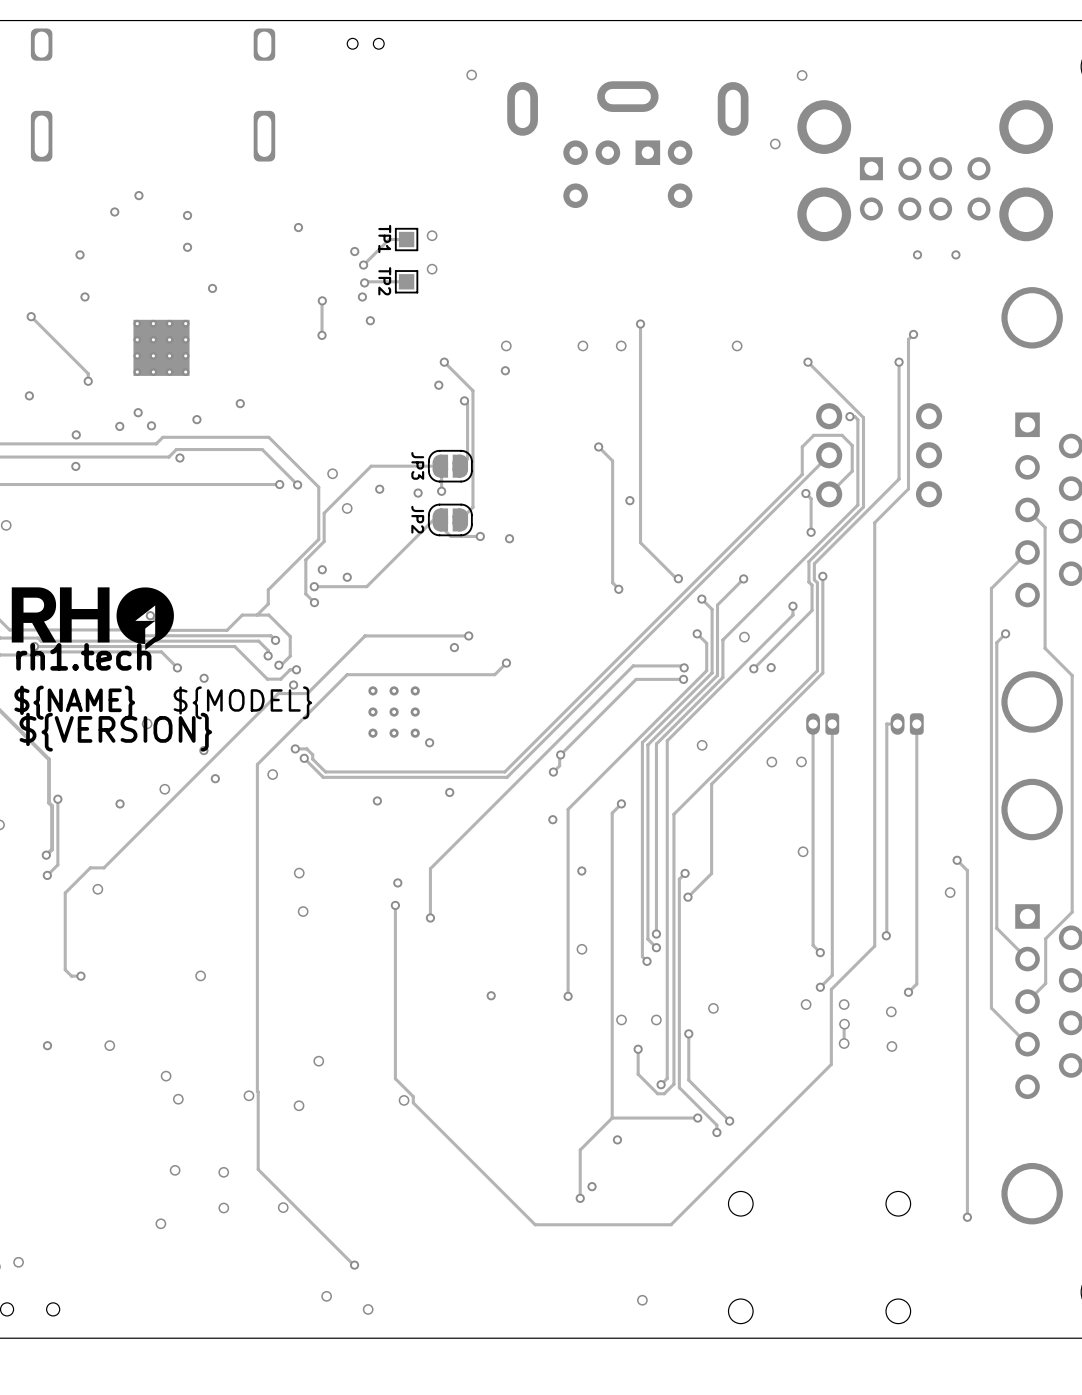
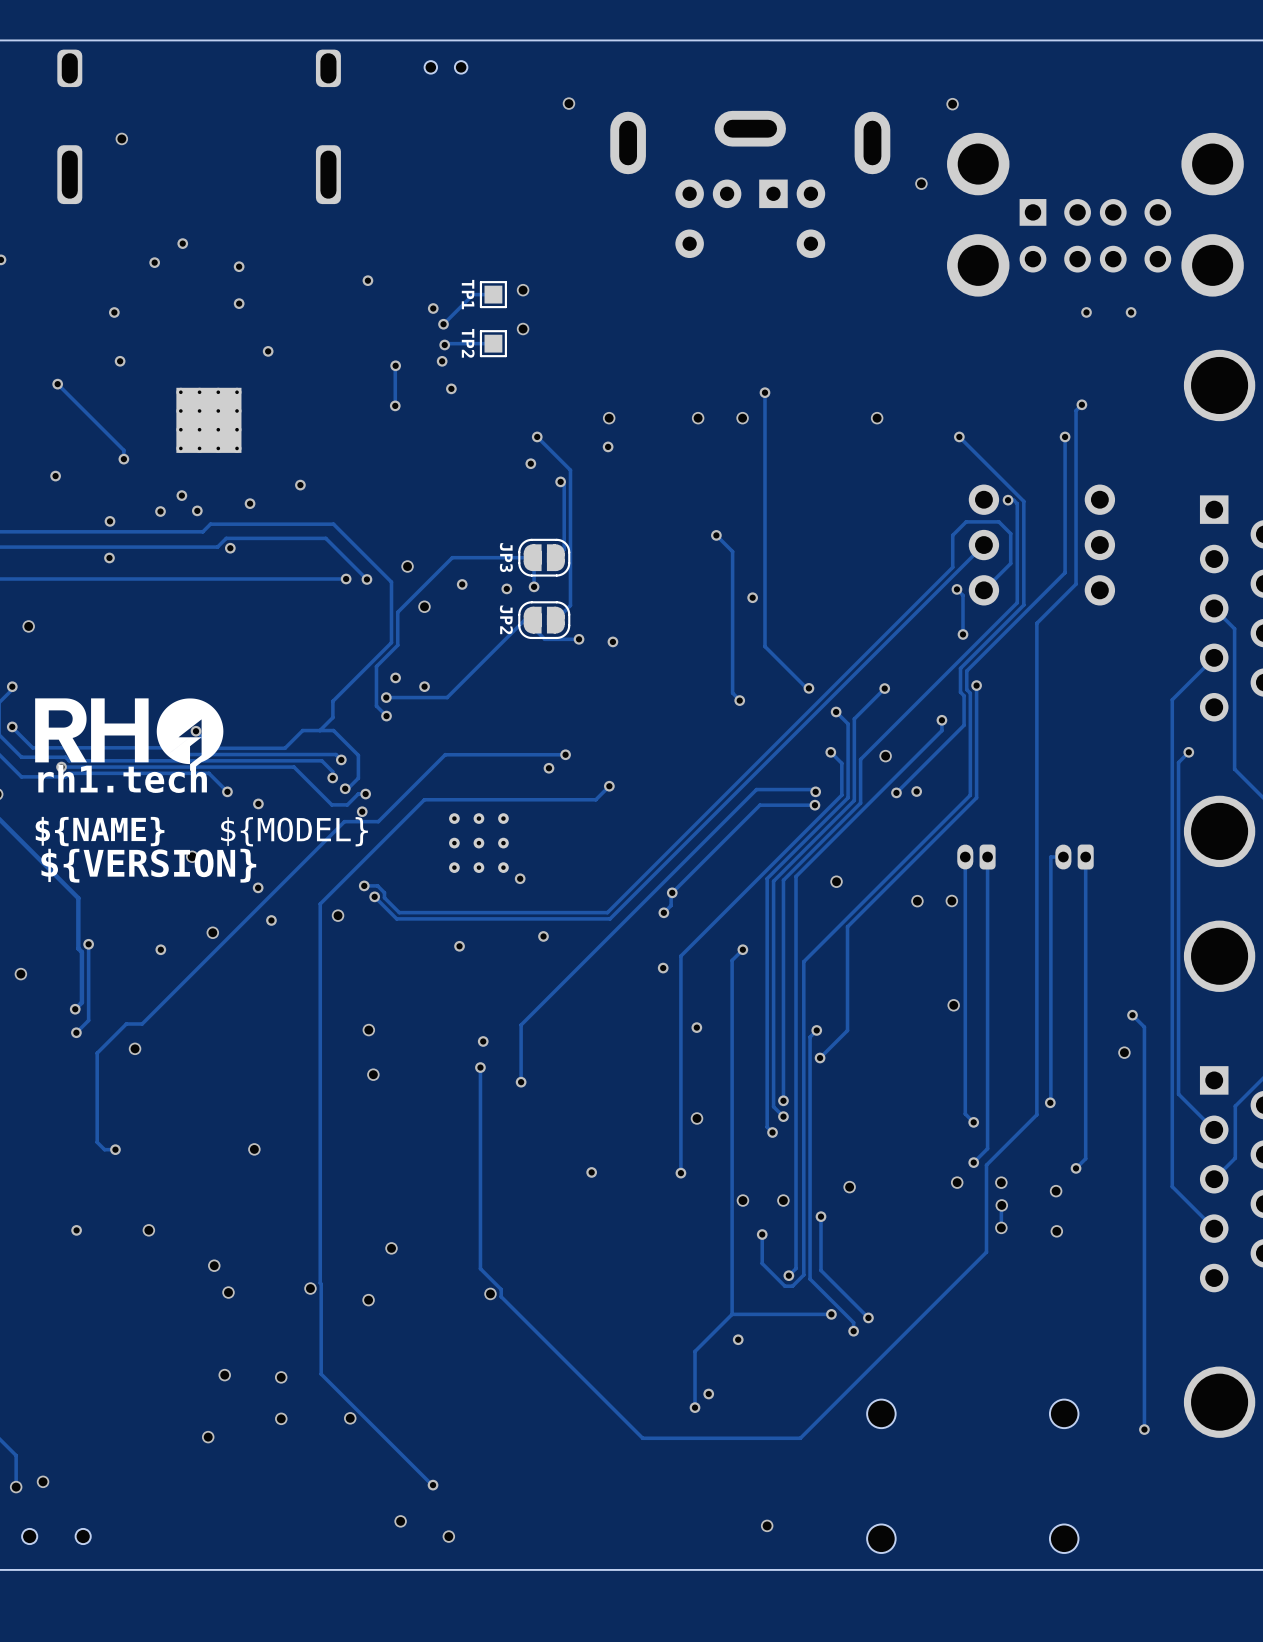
via: none -> (121, 138)

